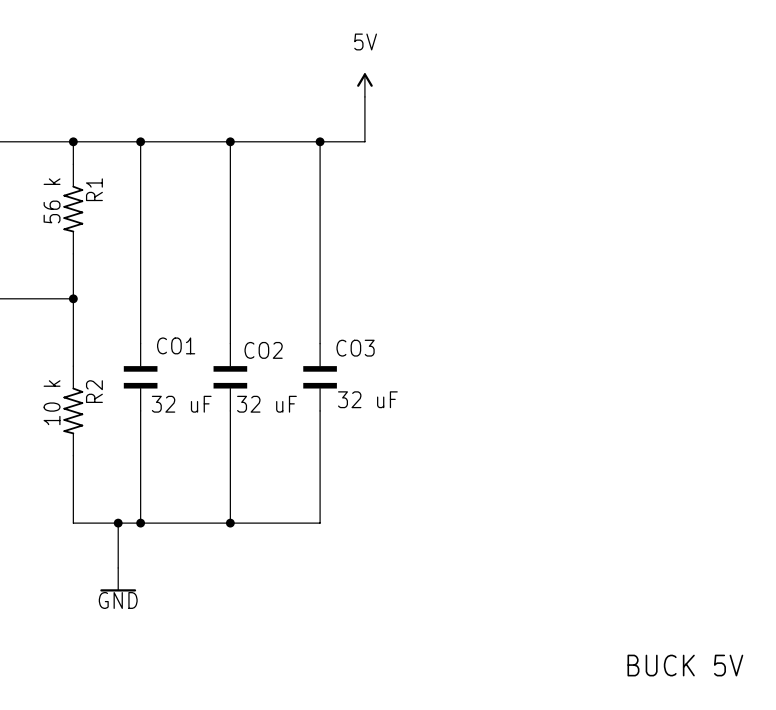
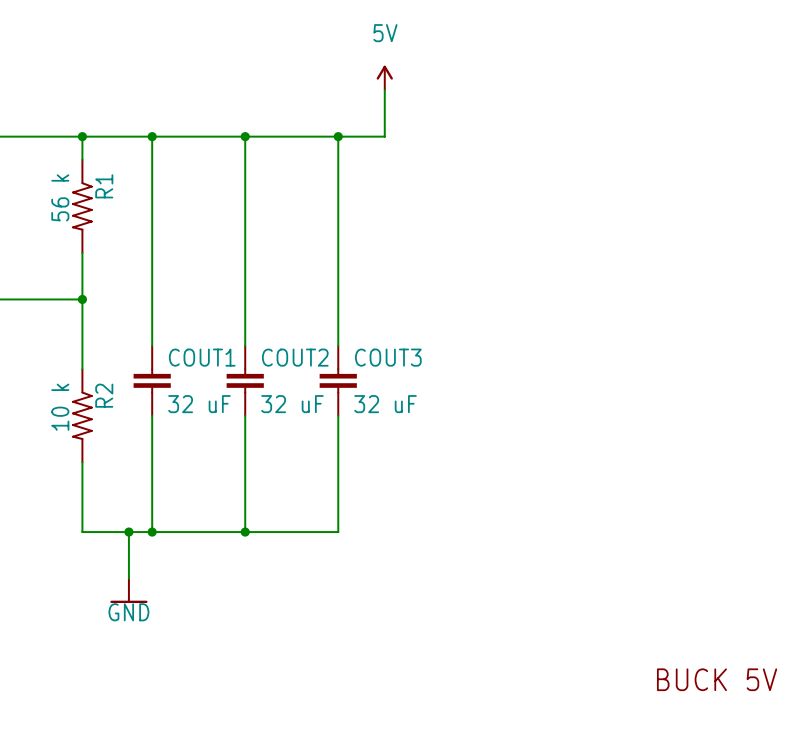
CO1: 32 uF (140, 377) -> none
COUT1: none -> 32 uF (152, 380)
CO2: 32 uF (230, 377) -> none
COUT2: none -> 32 uF (245, 380)
CO3: 32 uF (320, 377) -> none
COUT3: none -> 32 uF (338, 380)

